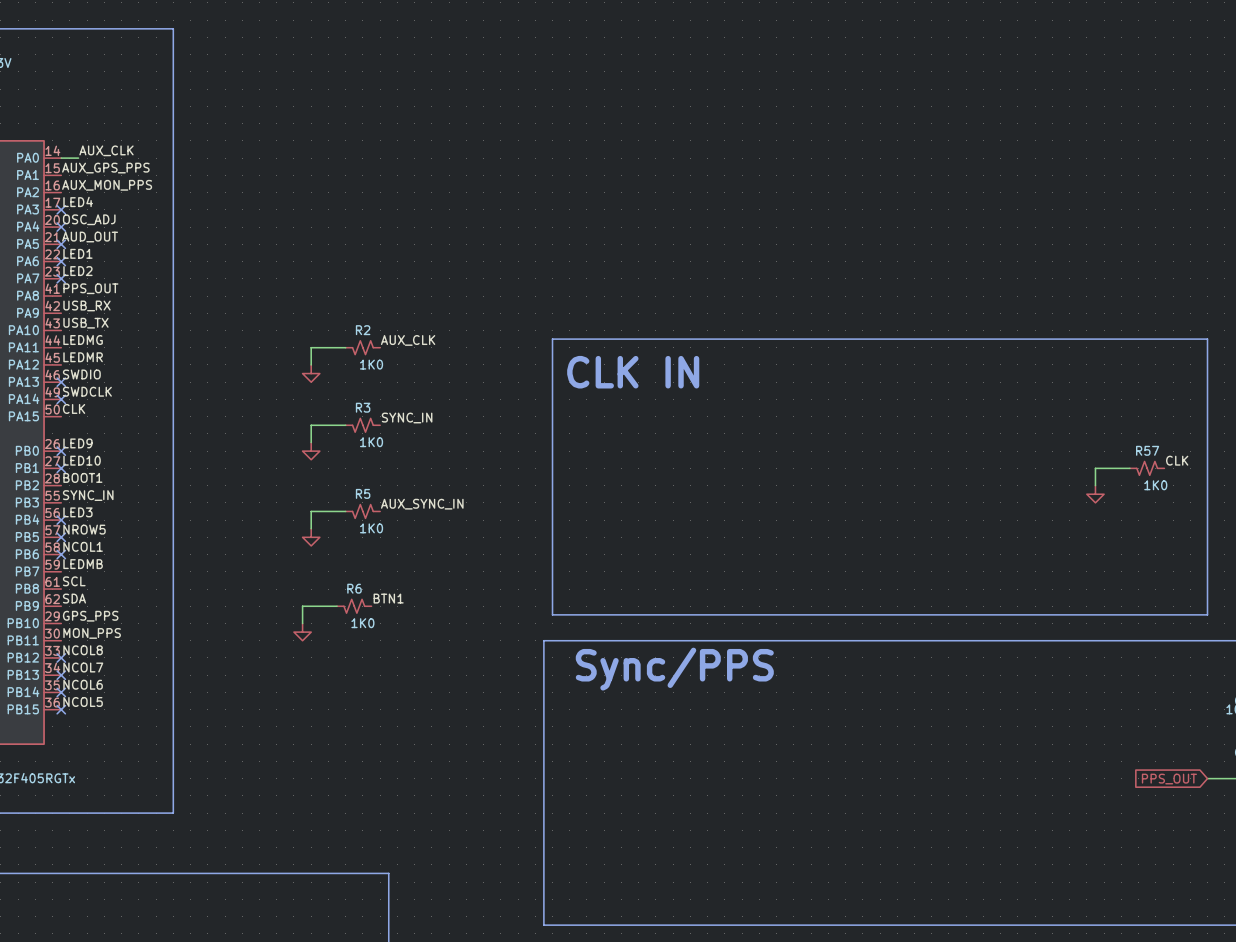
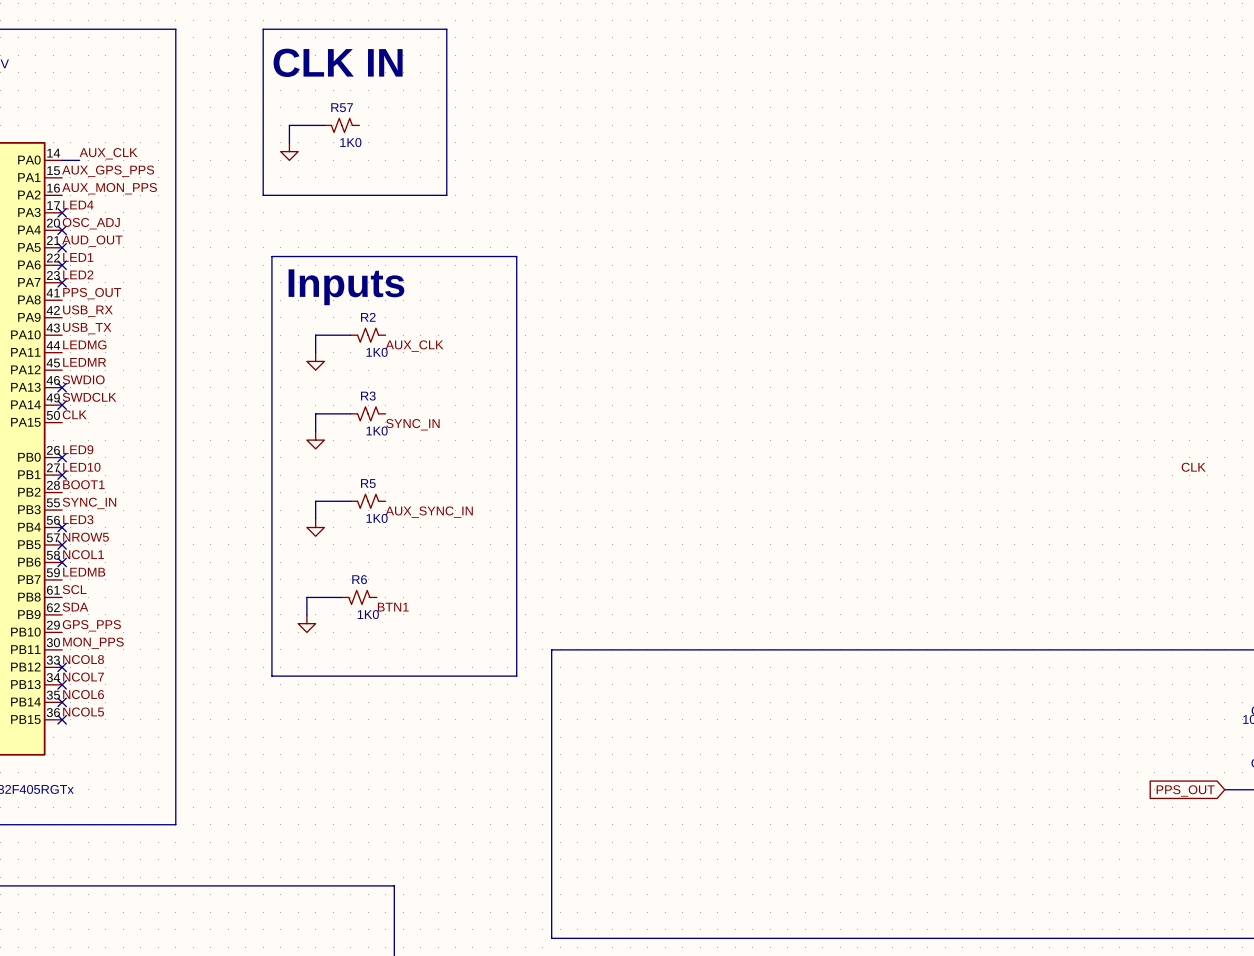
line: none -> (263, 29) (446, 29) (446, 195) (263, 195) (263, 29)
text: none -> CLK IN (338, 62)
wire: none -> (324, 125) (289, 125) (289, 142)
power symbol: none -> (289, 151)
line: none -> (271, 256) (516, 256) (516, 676) (271, 676) (271, 256)
text: none -> Inputs (346, 287)
line: (552, 339) (1207, 339) (1207, 614) (552, 614) (552, 339) -> none
wire: (345, 347) (311, 347) (311, 364) -> (350, 335) (315, 335) (315, 352)
R2 position: (362, 347) -> (368, 335)
text: CLK IN (633, 372) -> none
power symbol position: (311, 373) -> (315, 361)
wire: (345, 425) (311, 425) (311, 442) -> (350, 413) (315, 413) (315, 431)
R3 position: (362, 425) -> (368, 413)
power symbol position: (311, 451) -> (315, 440)
wire: (1129, 468) (1095, 468) (1095, 485) -> none
R57 position: (1147, 468) -> (341, 125)
power symbol: (1095, 494) -> none
wire: (345, 511) (311, 511) (311, 528) -> (350, 501) (315, 501) (315, 518)
R5 position: (362, 511) -> (368, 501)
power symbol position: (311, 537) -> (315, 527)
wire: (337, 606) (302, 606) (302, 623) -> (341, 597) (306, 597) (306, 614)
R6 position: (354, 606) -> (359, 597)
power symbol position: (302, 632) -> (306, 623)
text: Sync/PPS (674, 669) -> none

